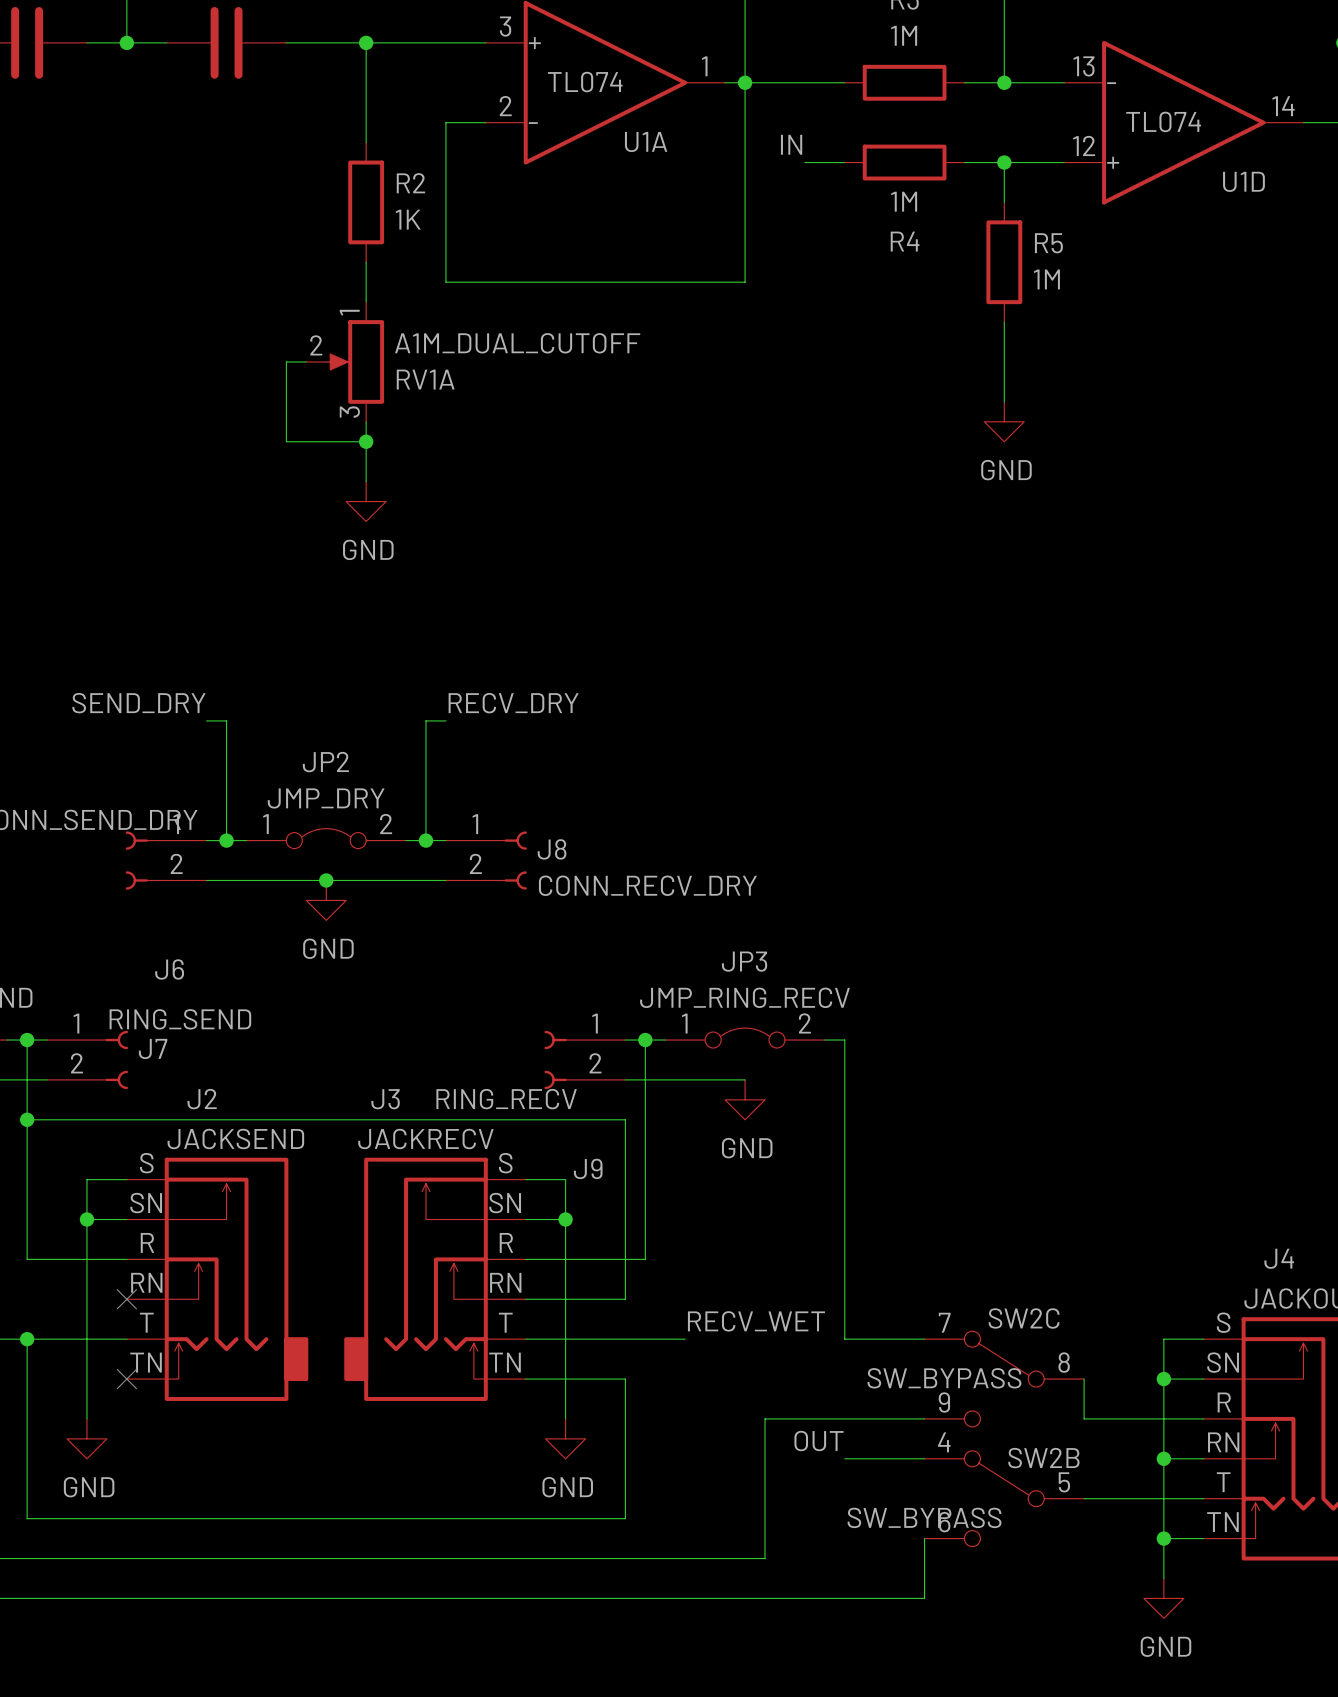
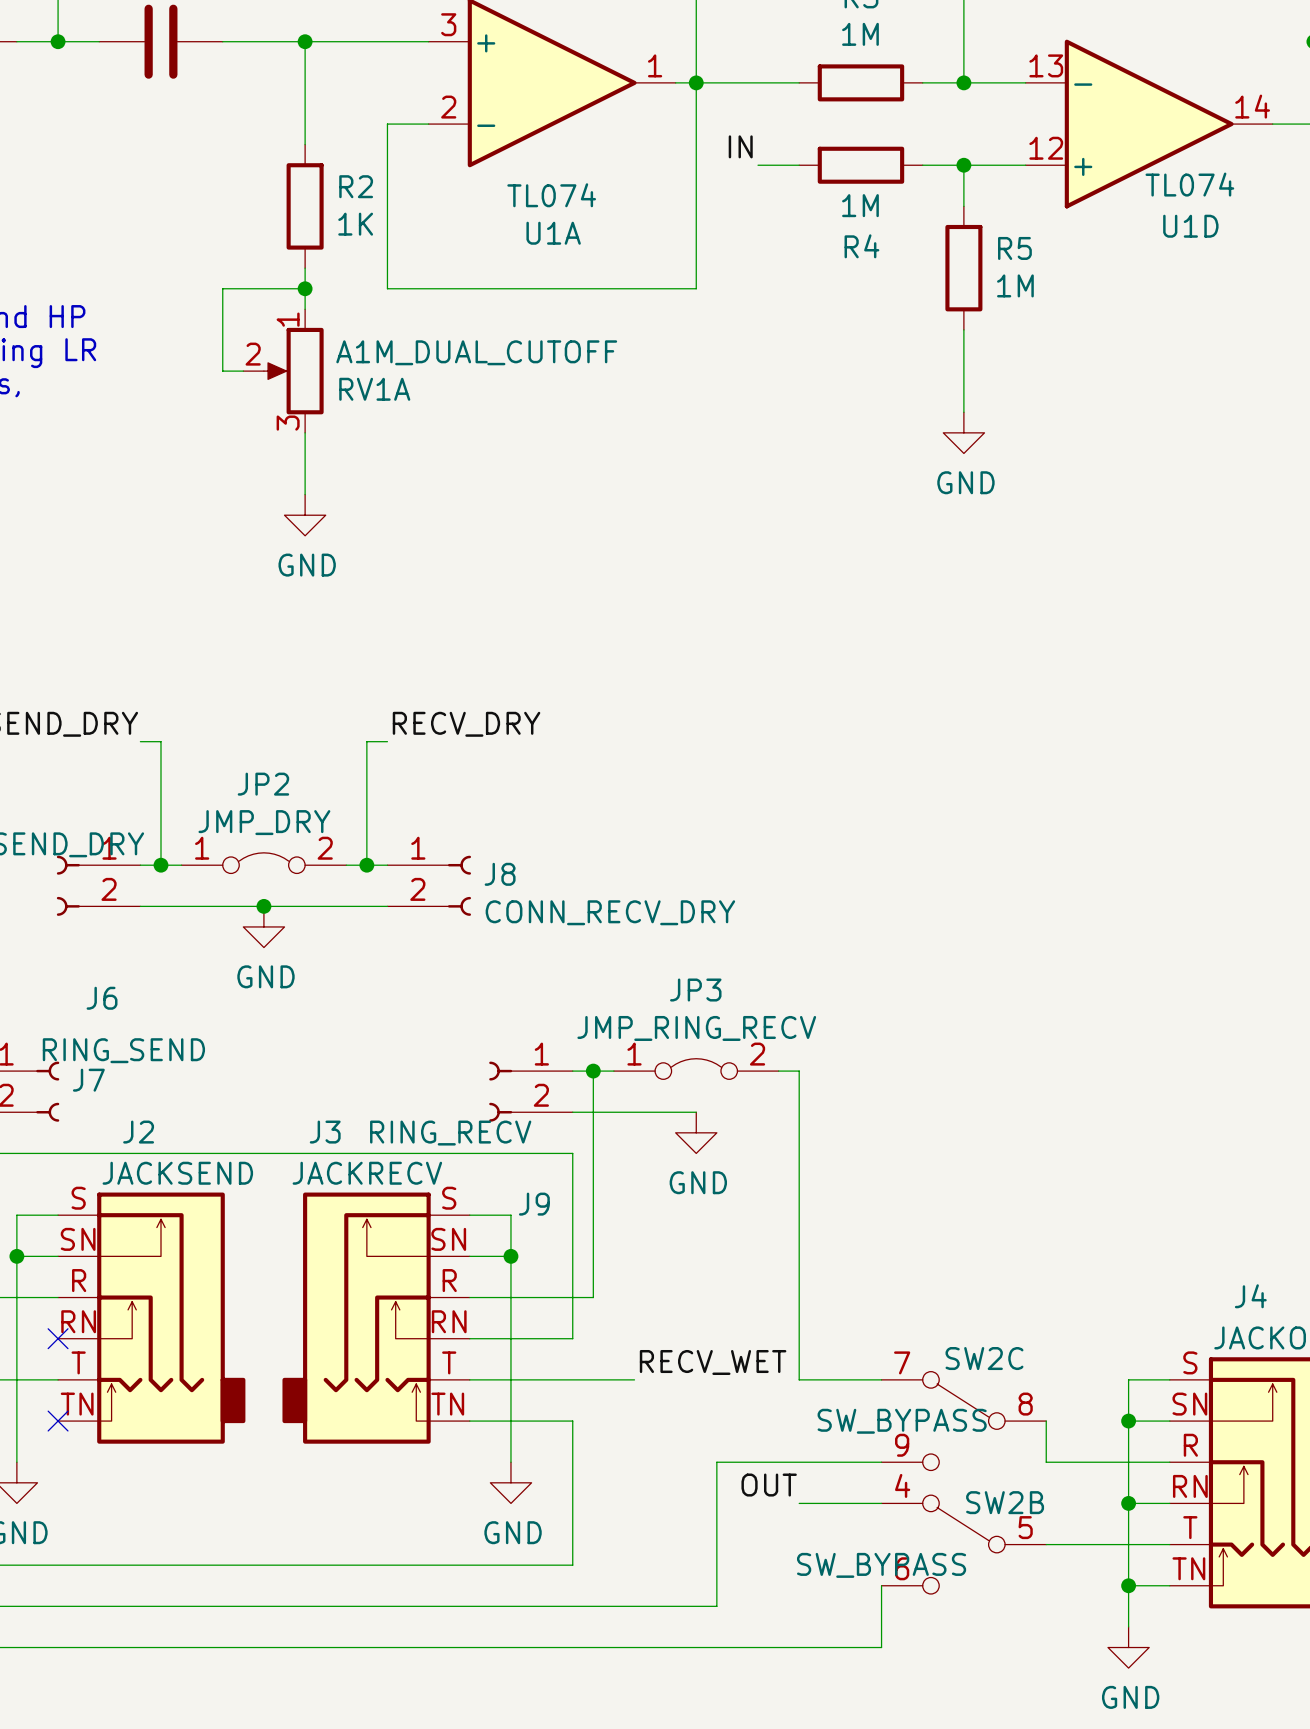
U1A value position: TL074 (585, 82) -> TL074 (551, 195)
U1D value position: TL074 (1163, 121) -> TL074 (1189, 184)
U1A name position: U1A (646, 141) -> U1A (553, 233)
U1D name position: U1D (1243, 181) -> U1D (1190, 226)
junction: none -> (305, 288)
wire: (286, 361) (286, 441) (366, 441) -> (222, 371) (222, 288) (305, 288)
junction: (366, 441) -> none

